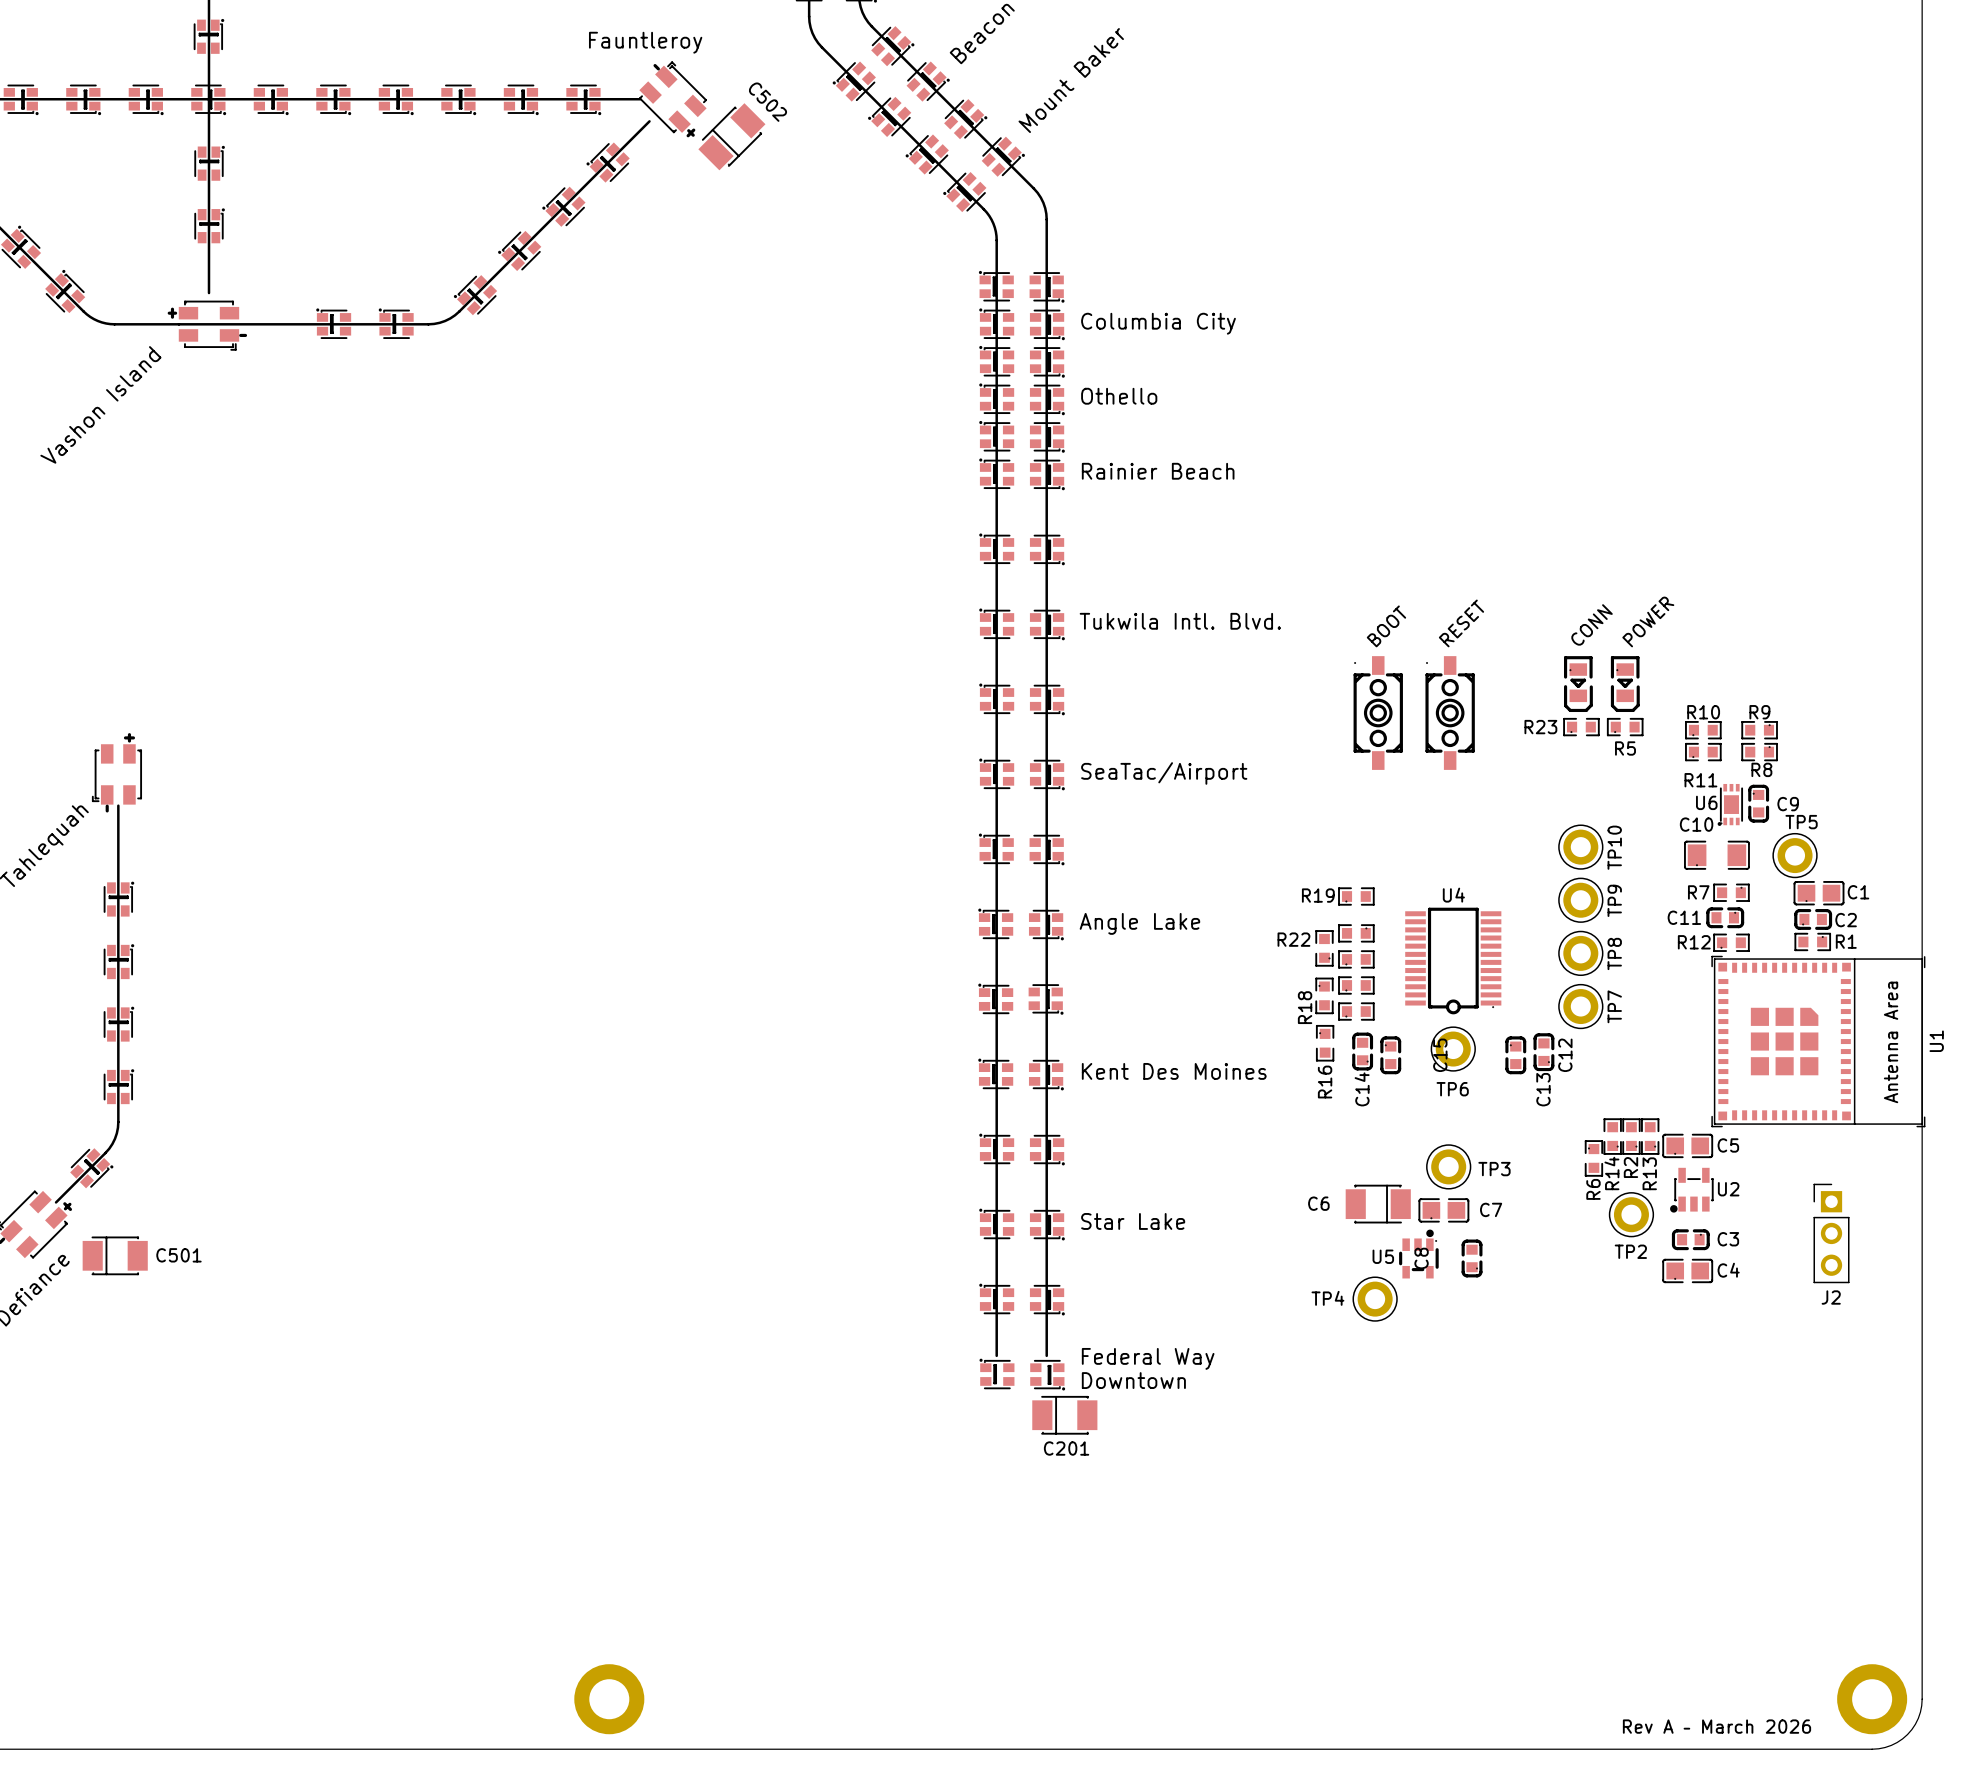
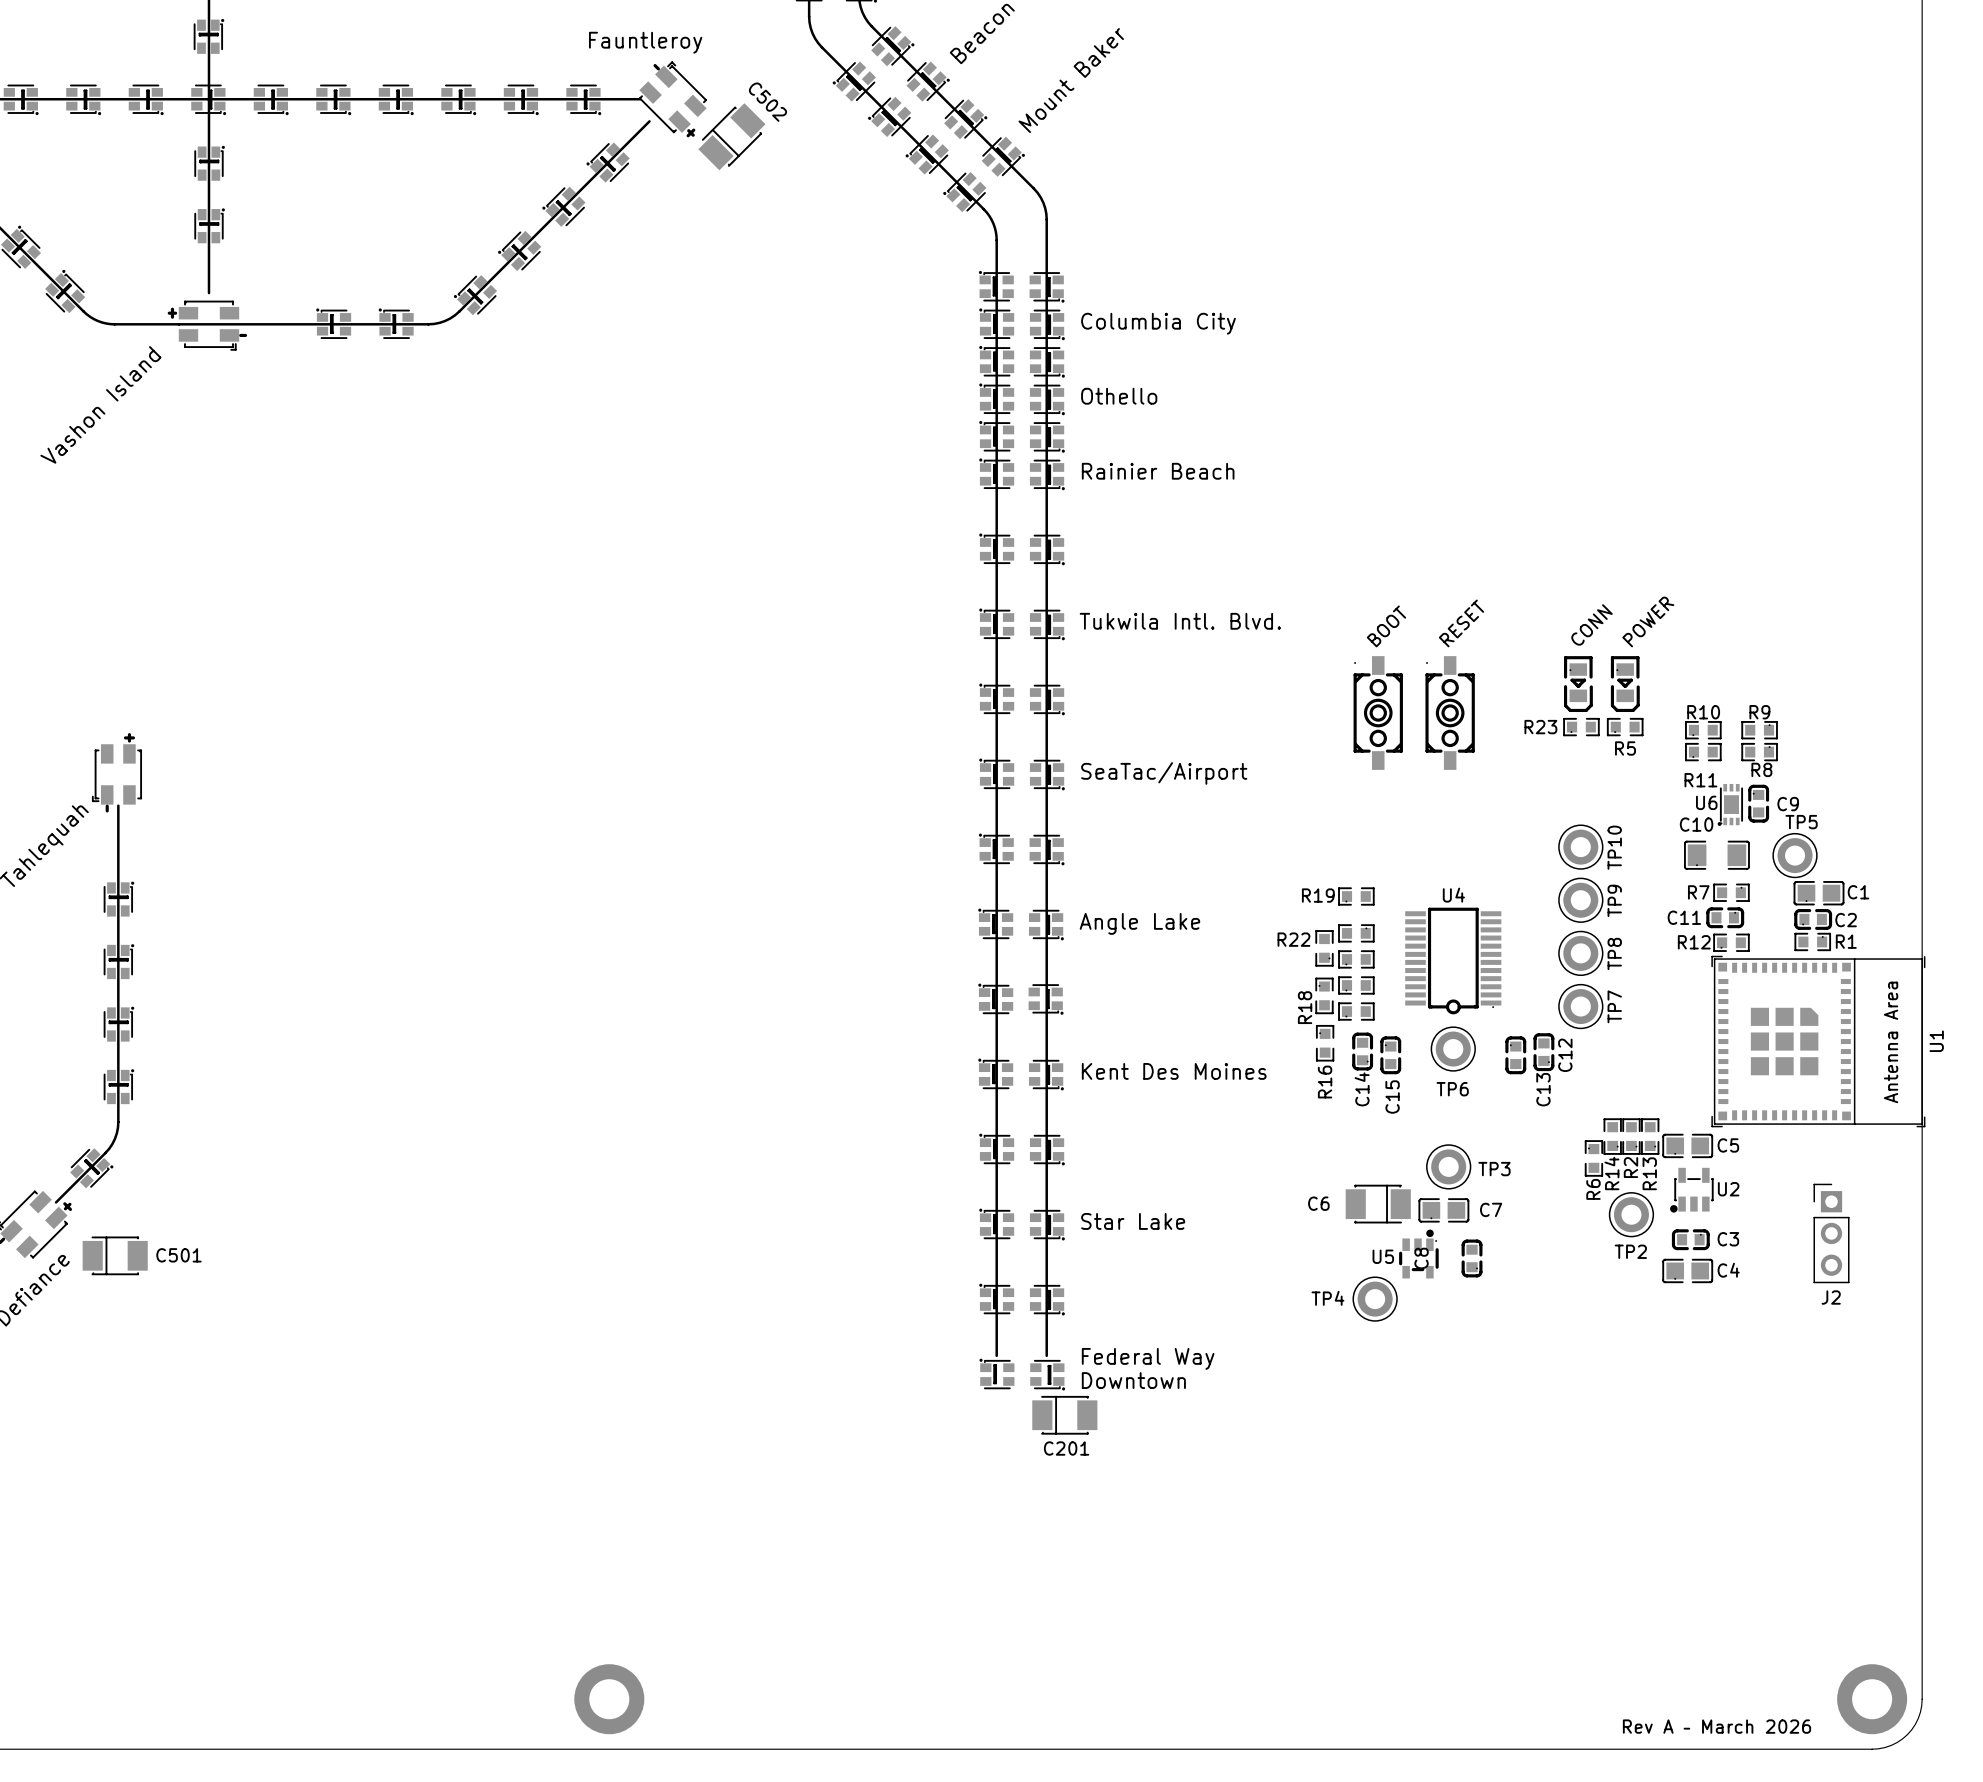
C15 name position: C15 (1440, 1055) -> C15 (1392, 1097)

